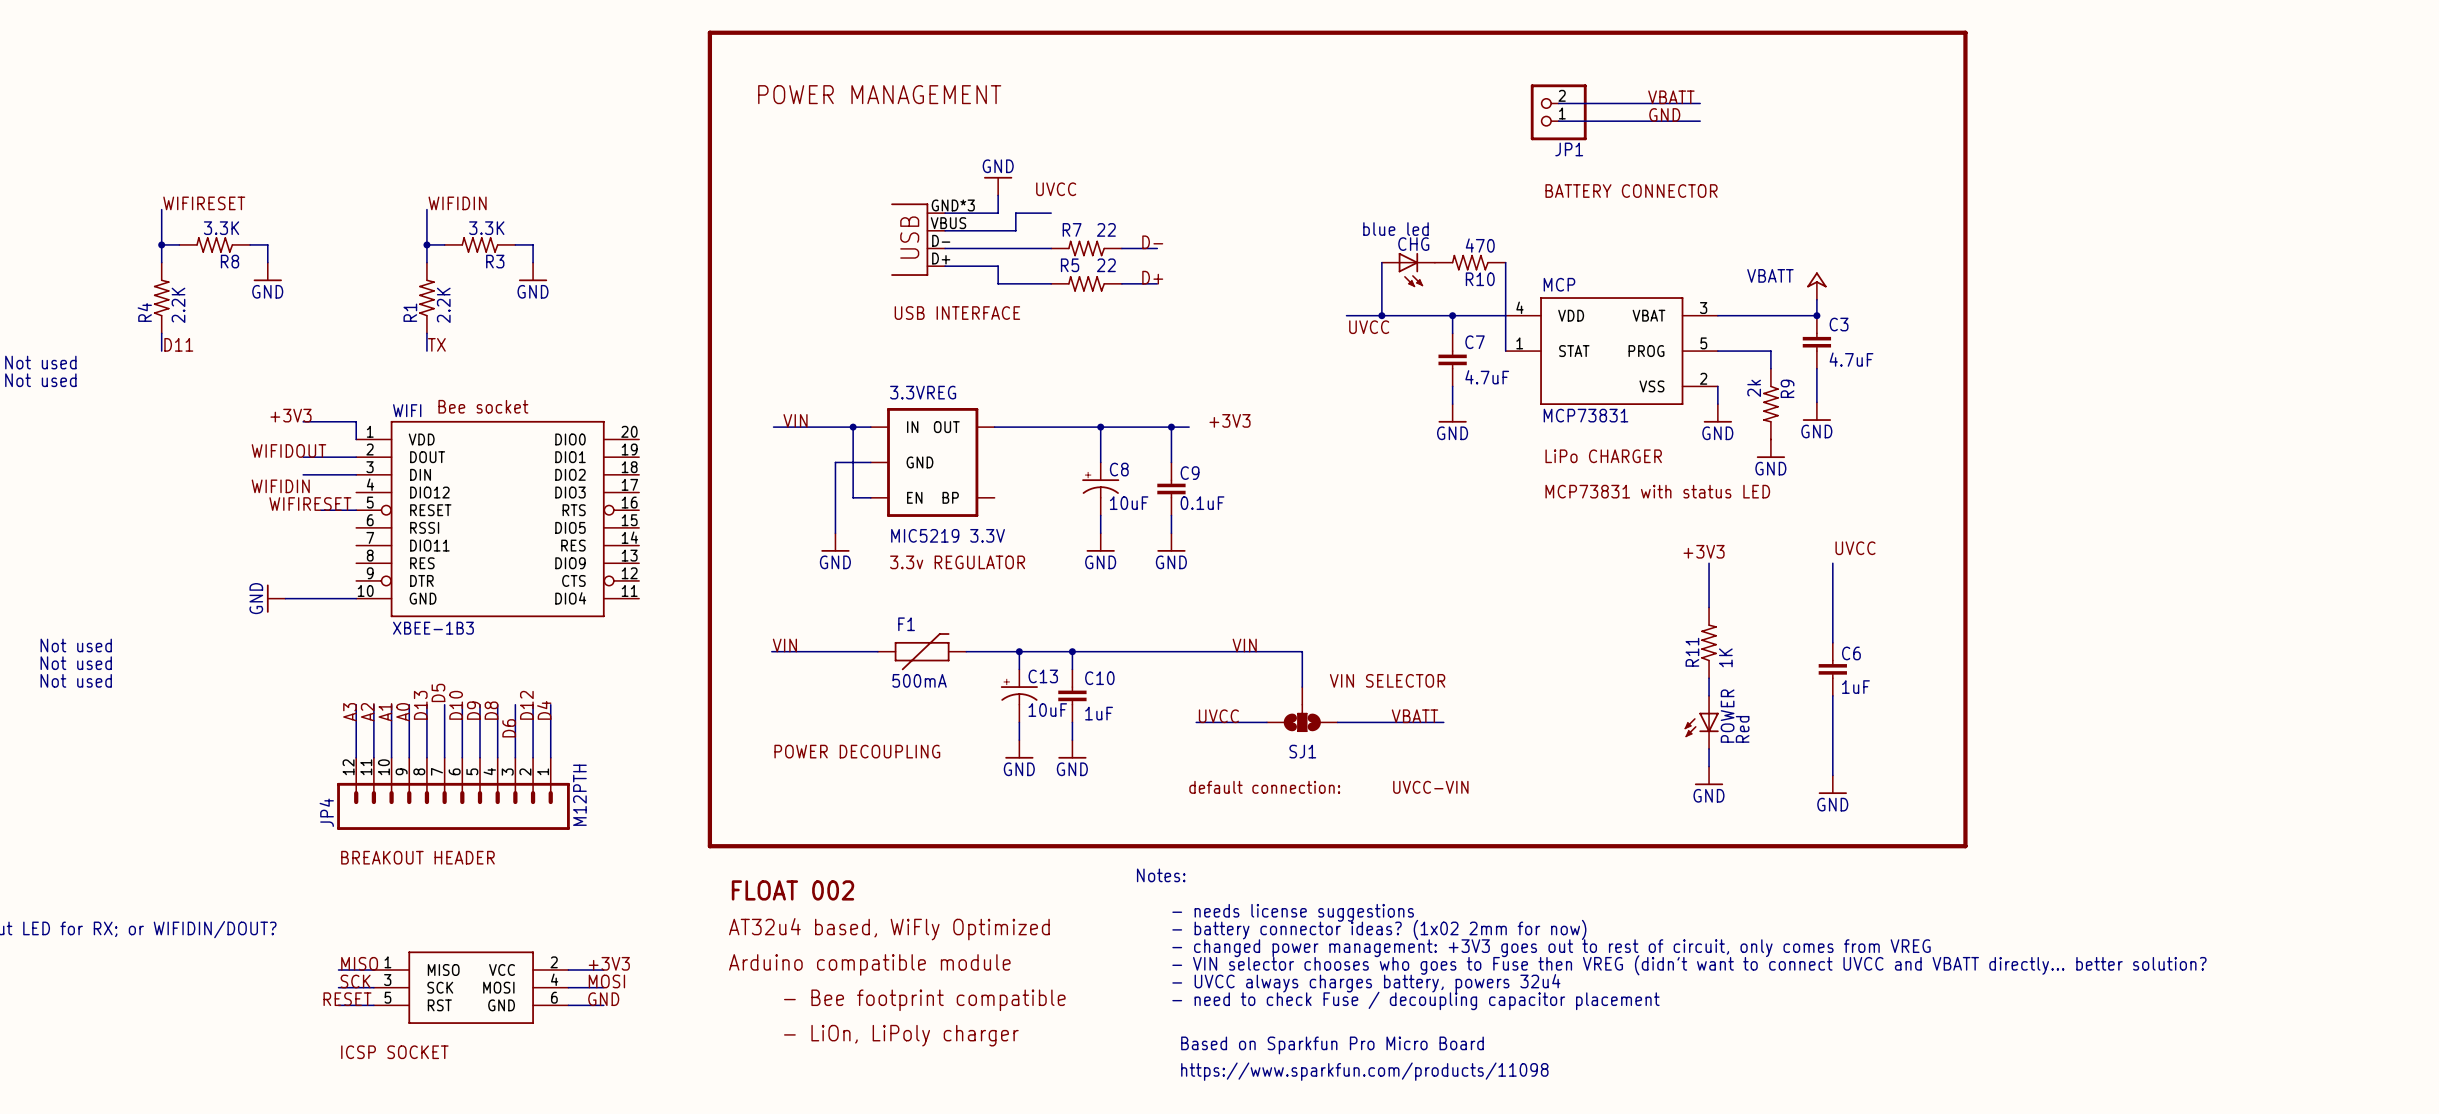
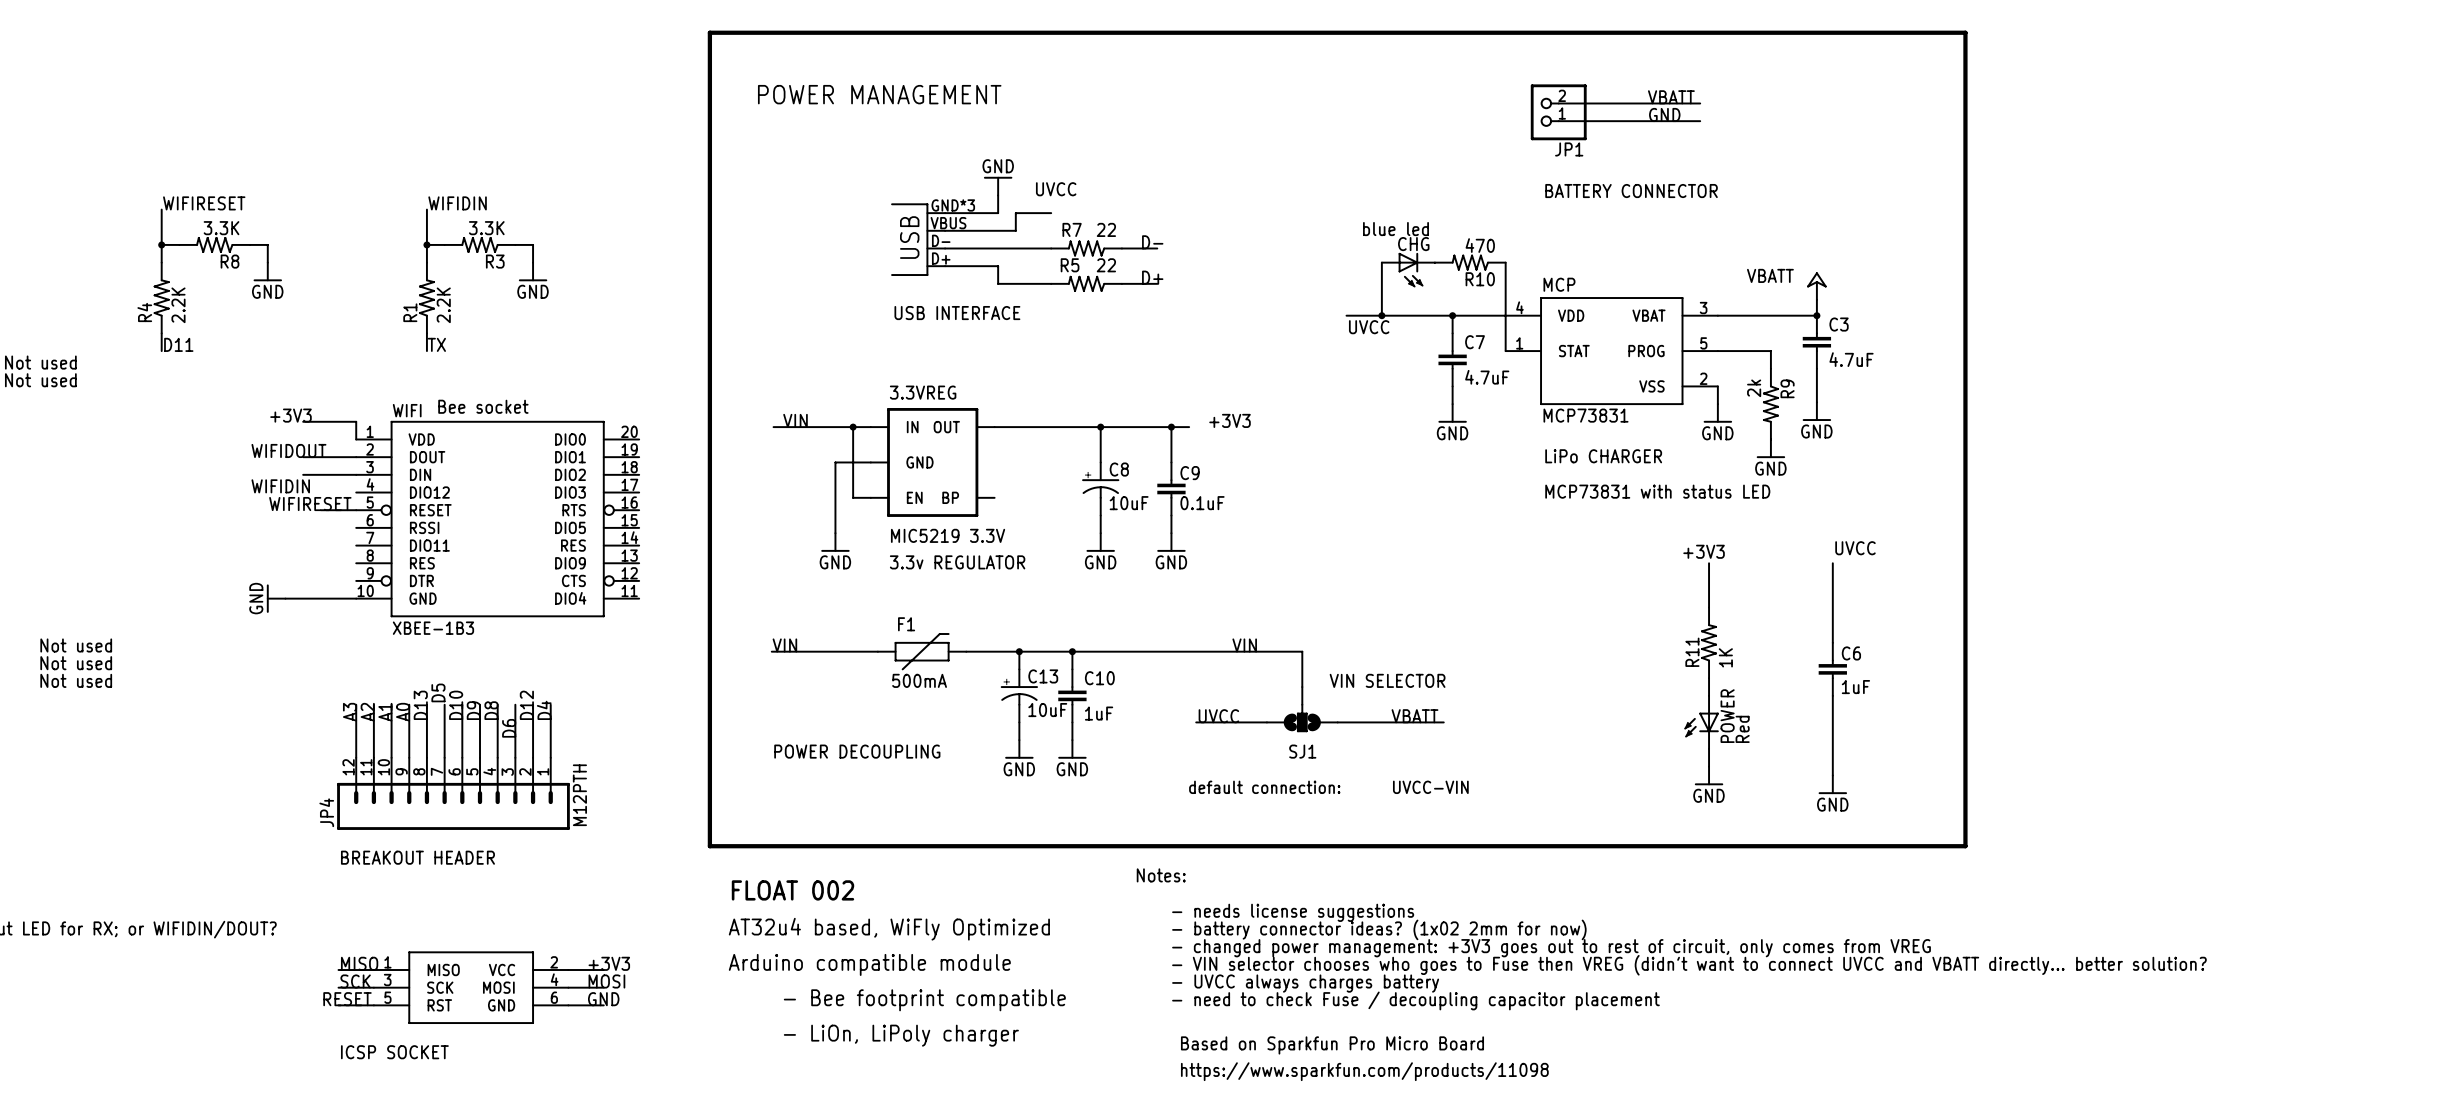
text: - UVCC always charges battery, powers 32u4 (1366, 983) -> - UVCC always charges battery (1305, 983)

